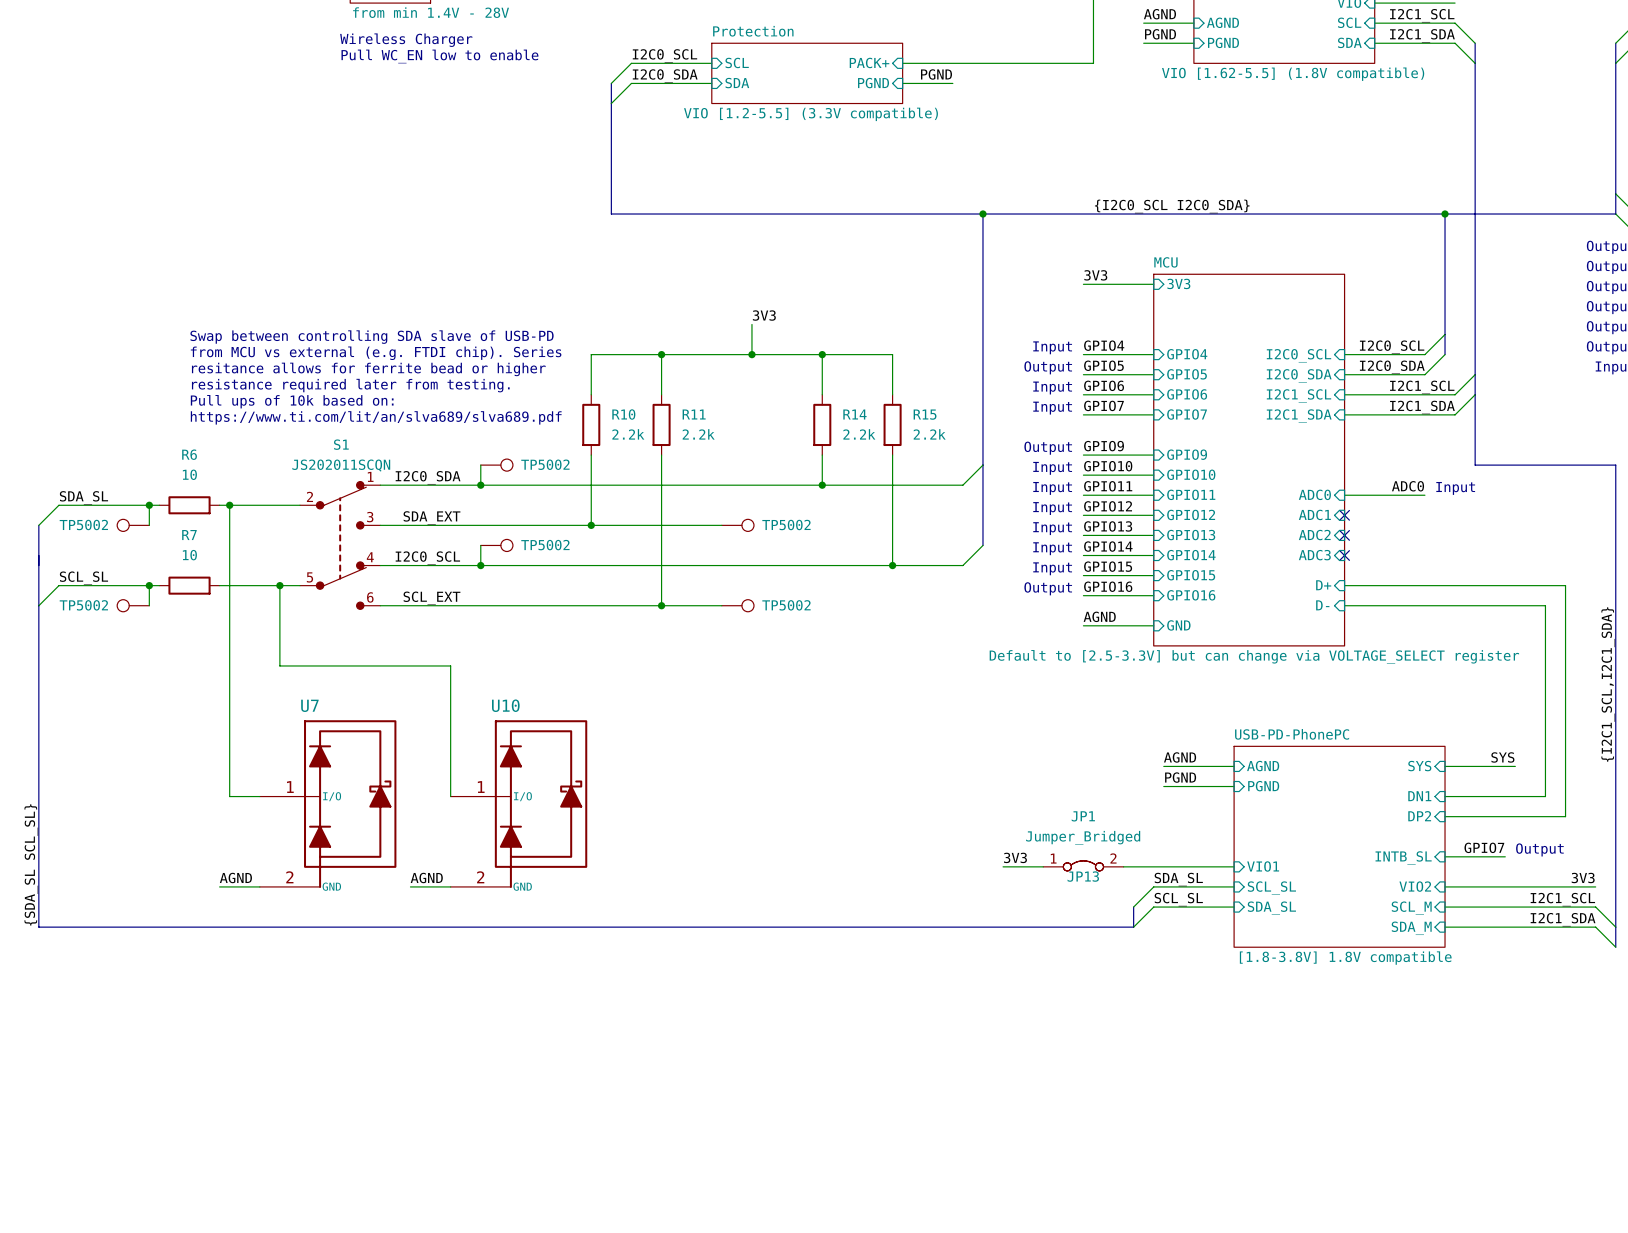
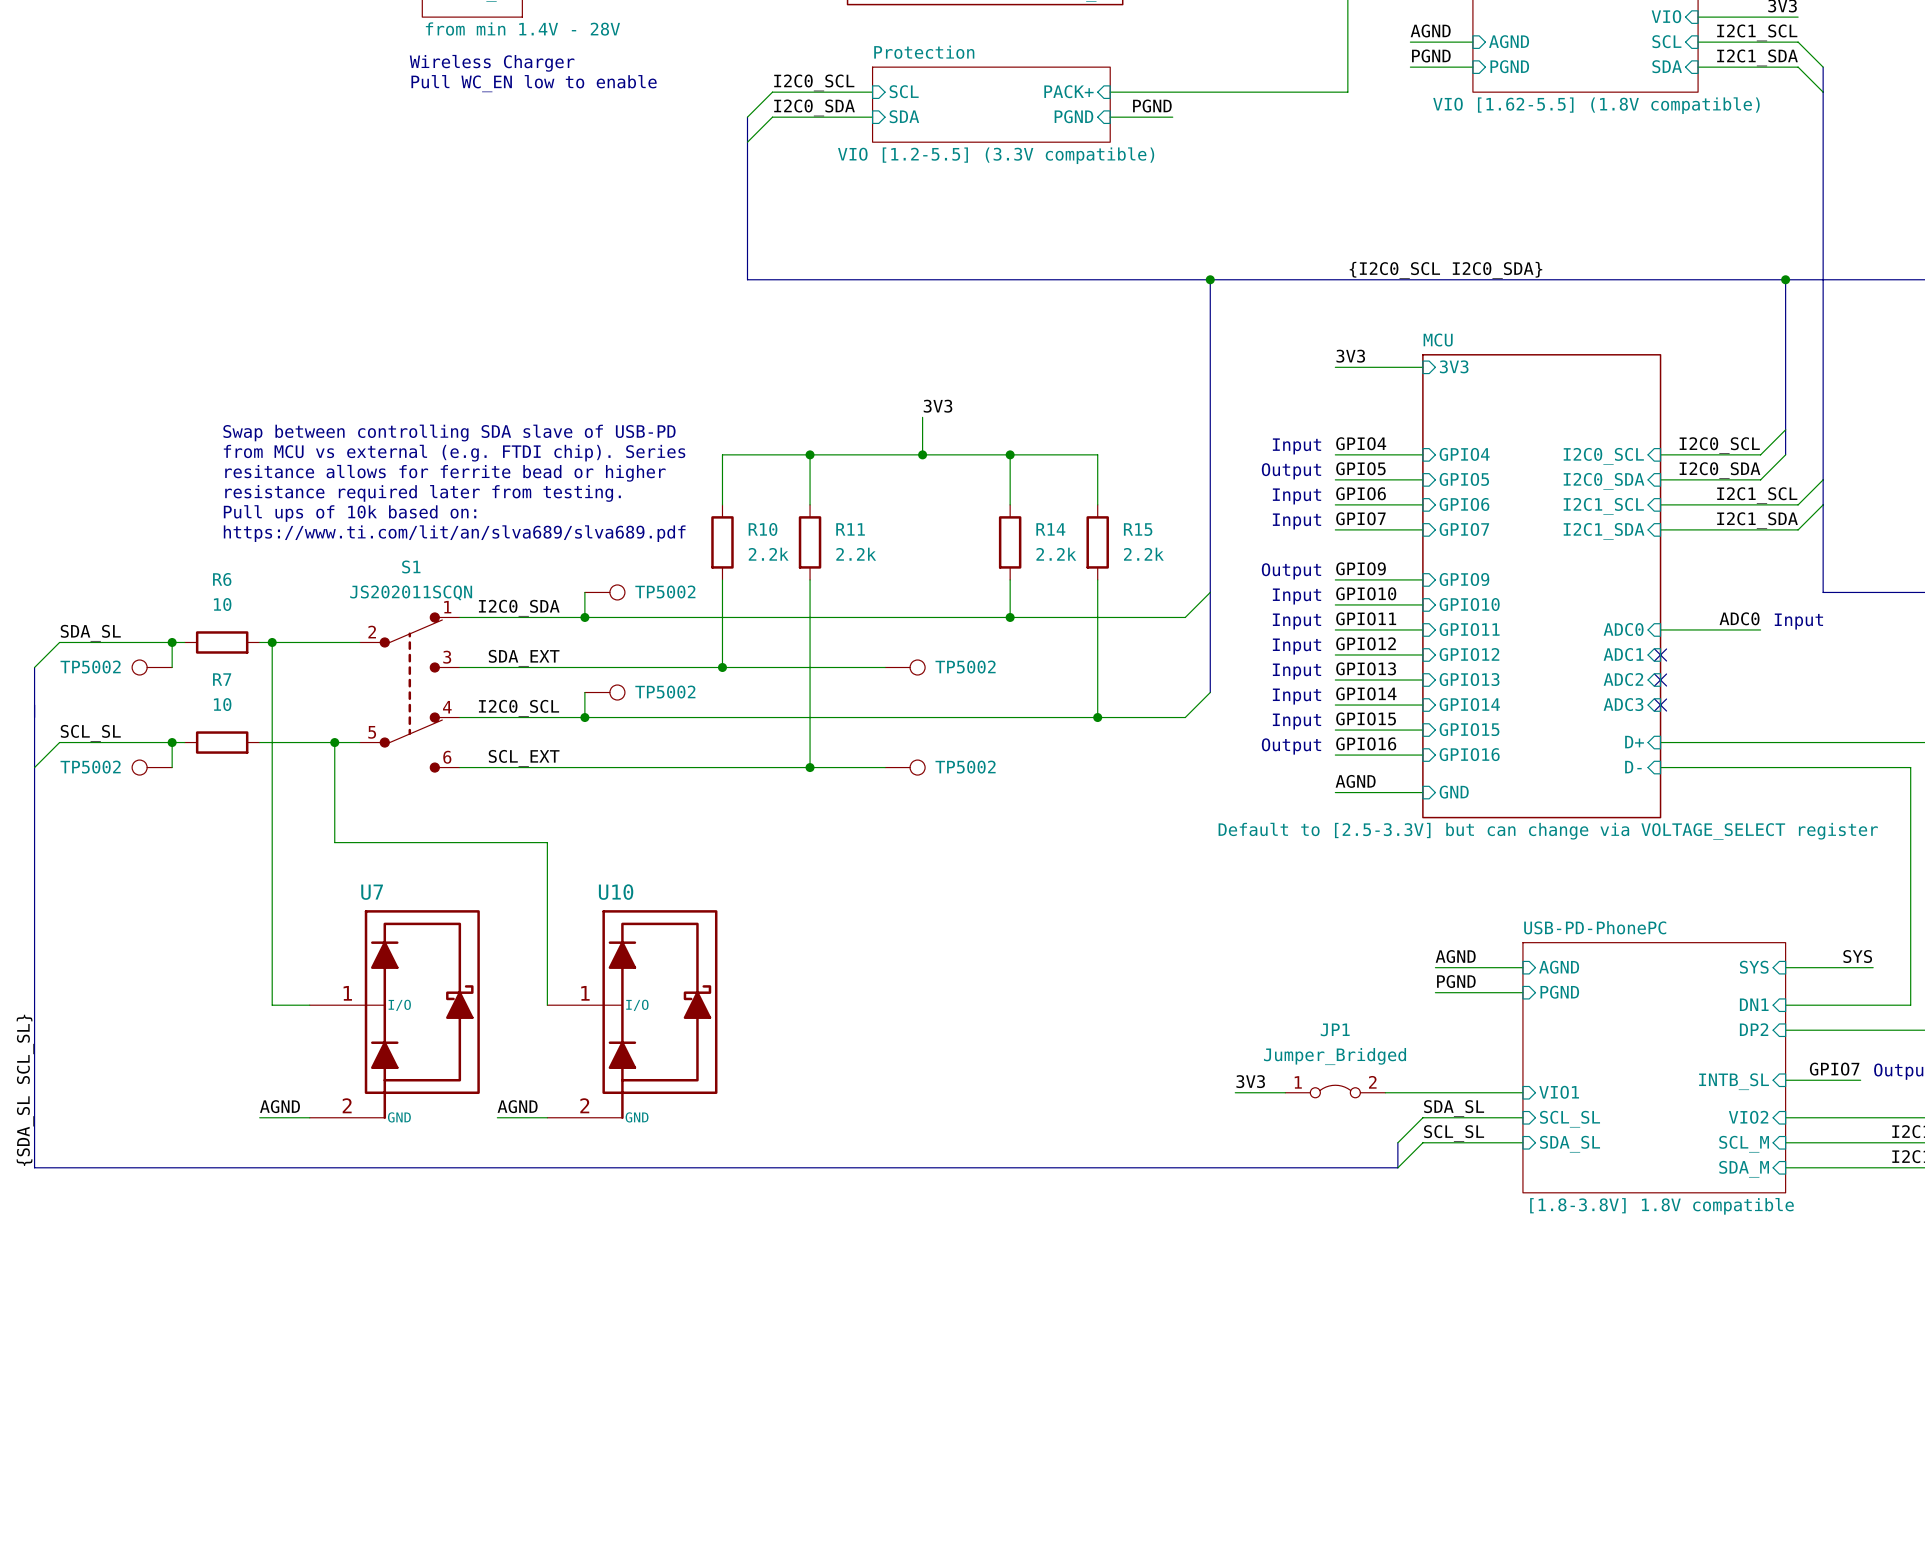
JP13: (1083, 865) -> none

